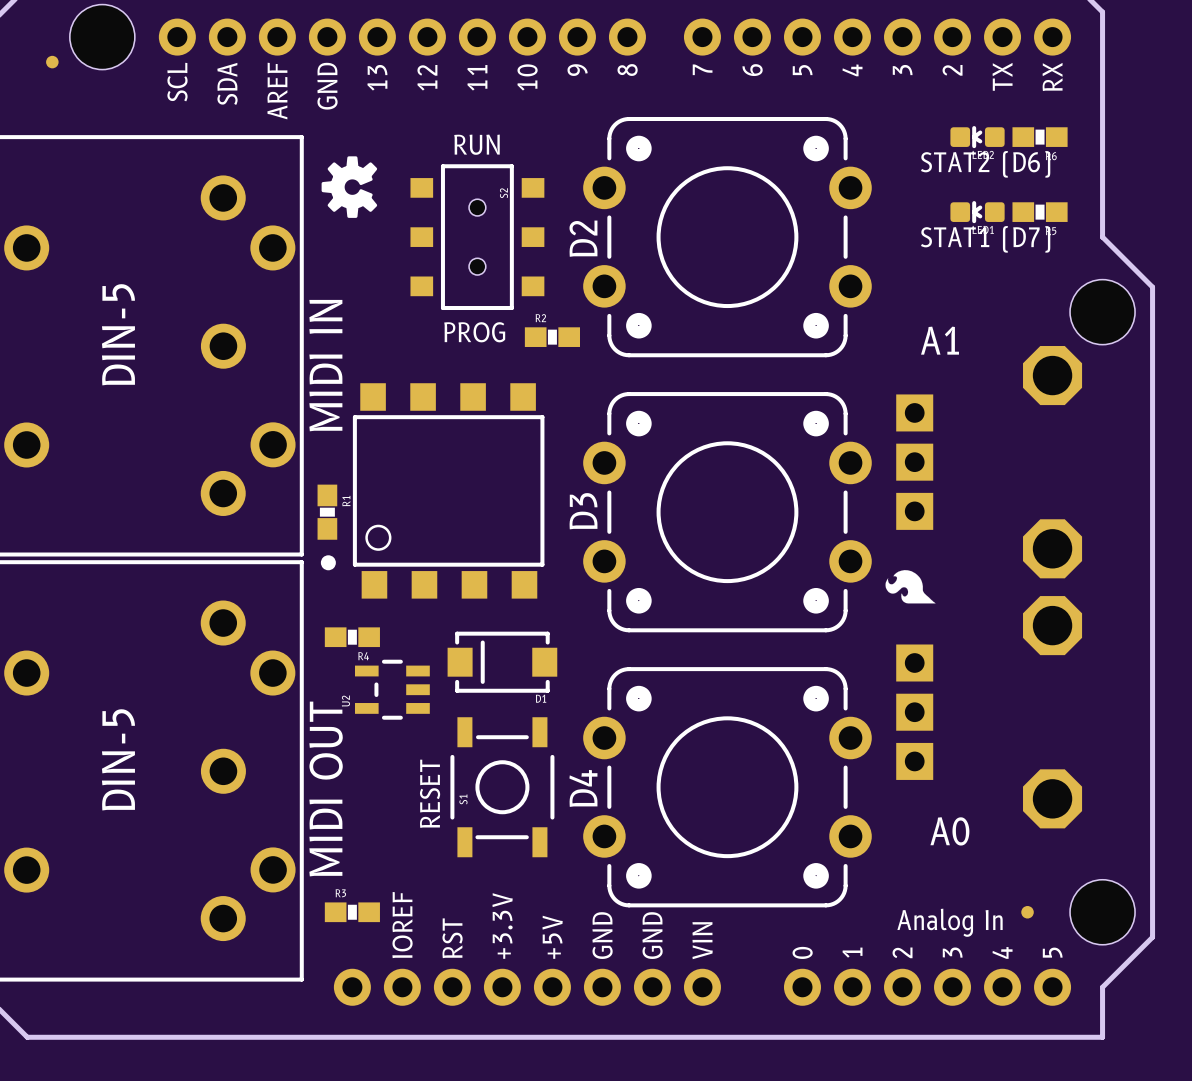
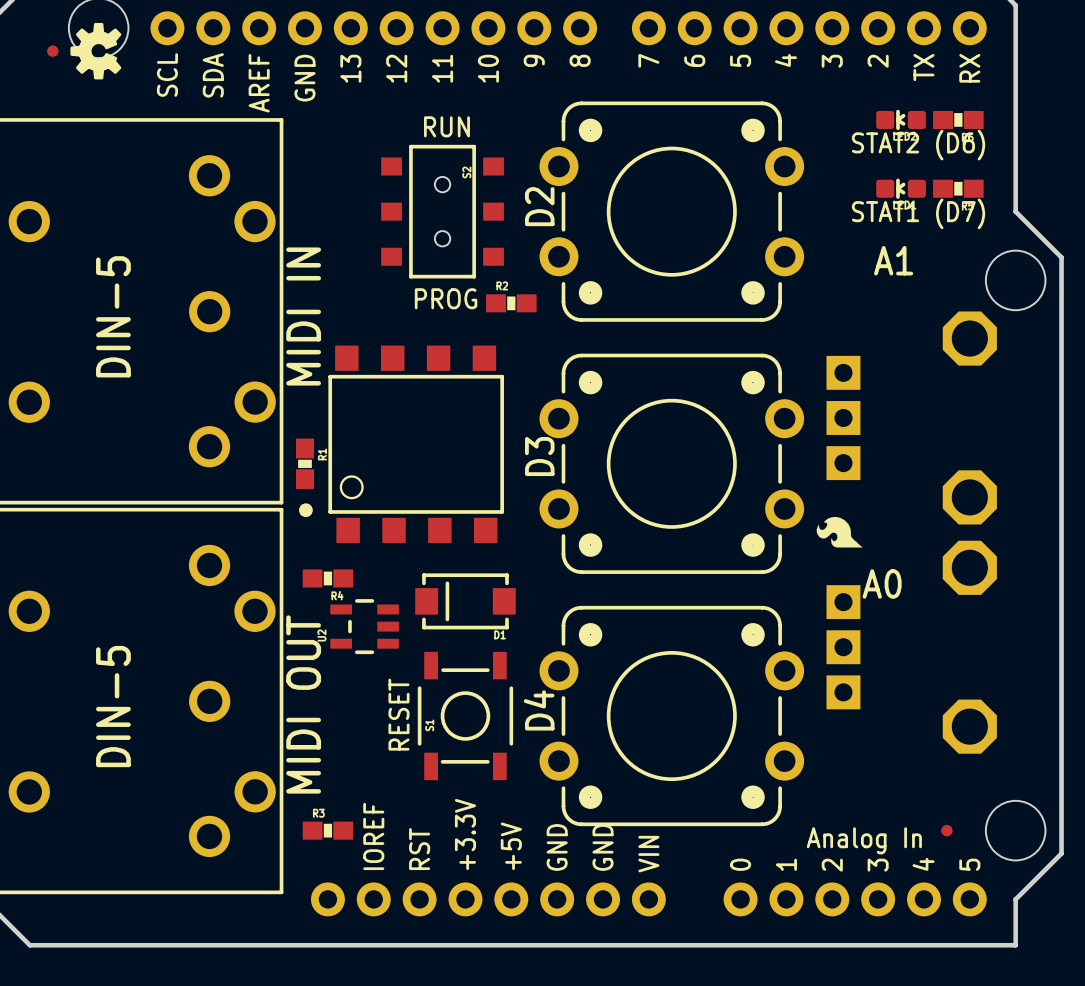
drawing position: (349, 187) -> (95, 51)
text position: A1 (940, 340) -> A1 (893, 260)
text position: A0 (949, 831) -> A0 (882, 583)

